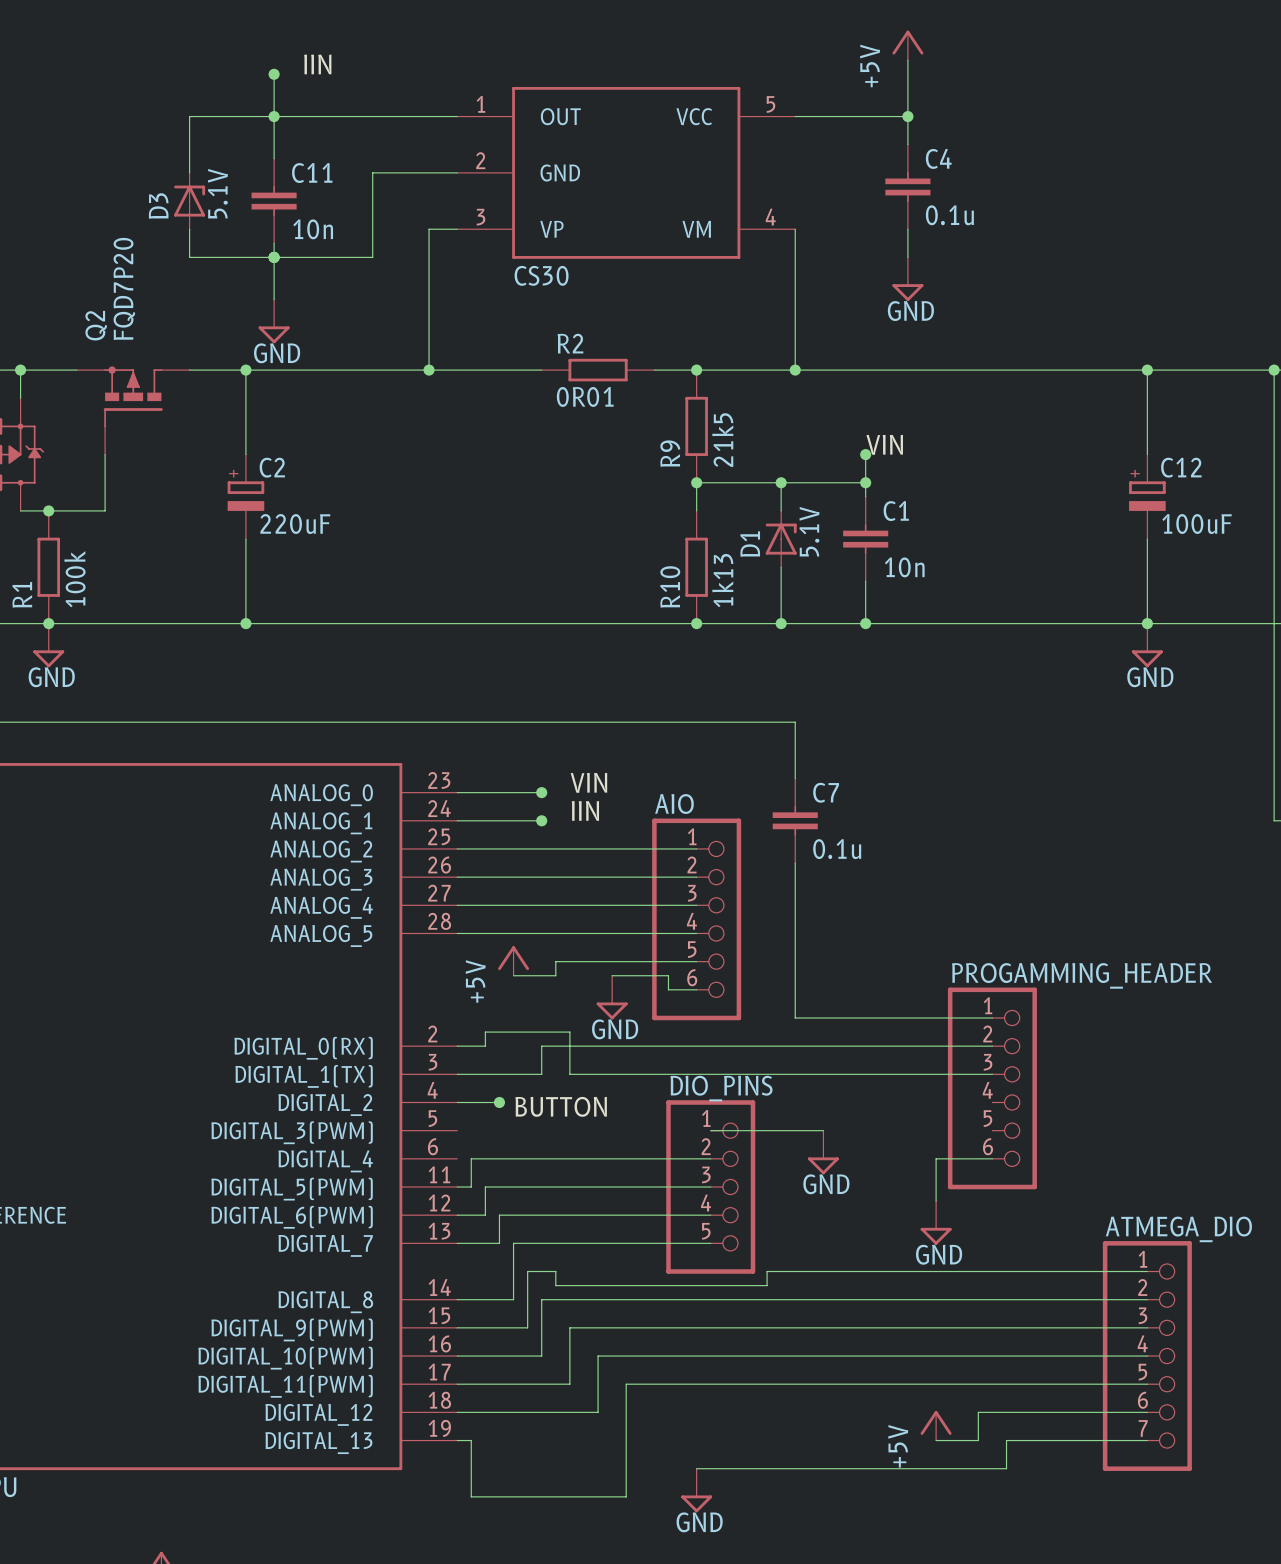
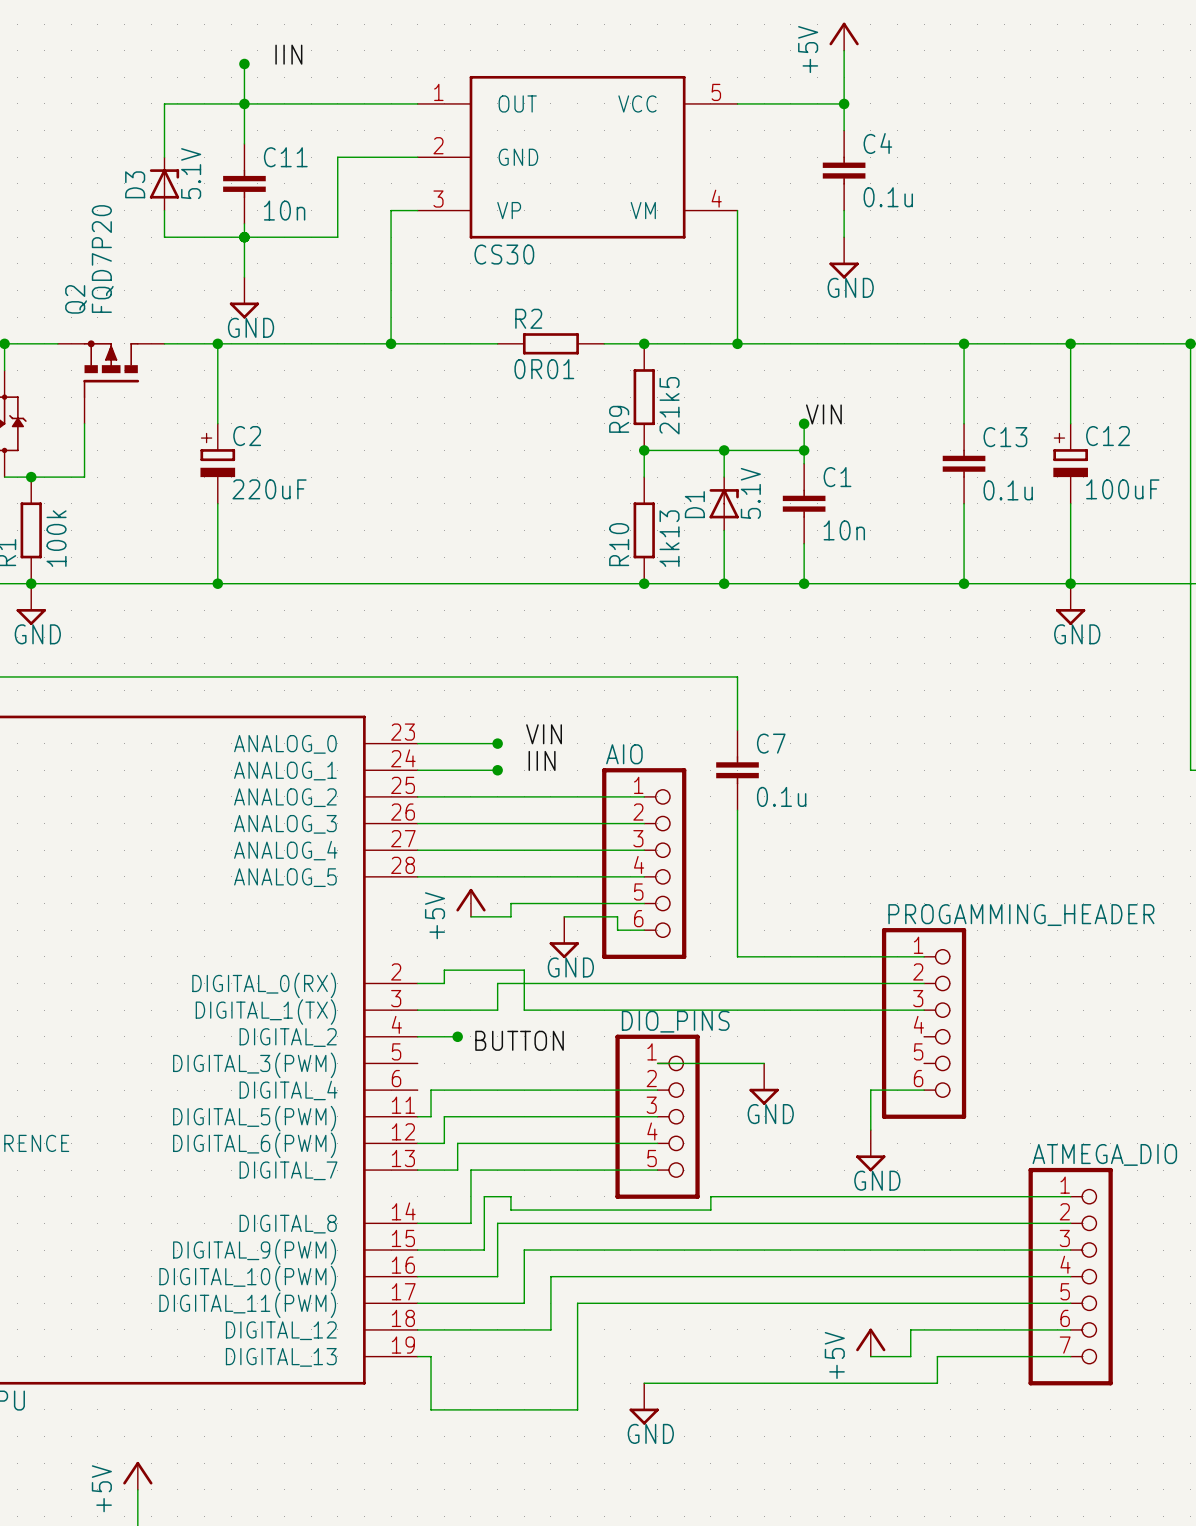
wire: none -> (964, 343) (964, 423)
junction: none -> (964, 343)
C13: none -> 0.1u (964, 463)
wire: none -> (964, 503) (964, 583)
junction: none -> (964, 583)

